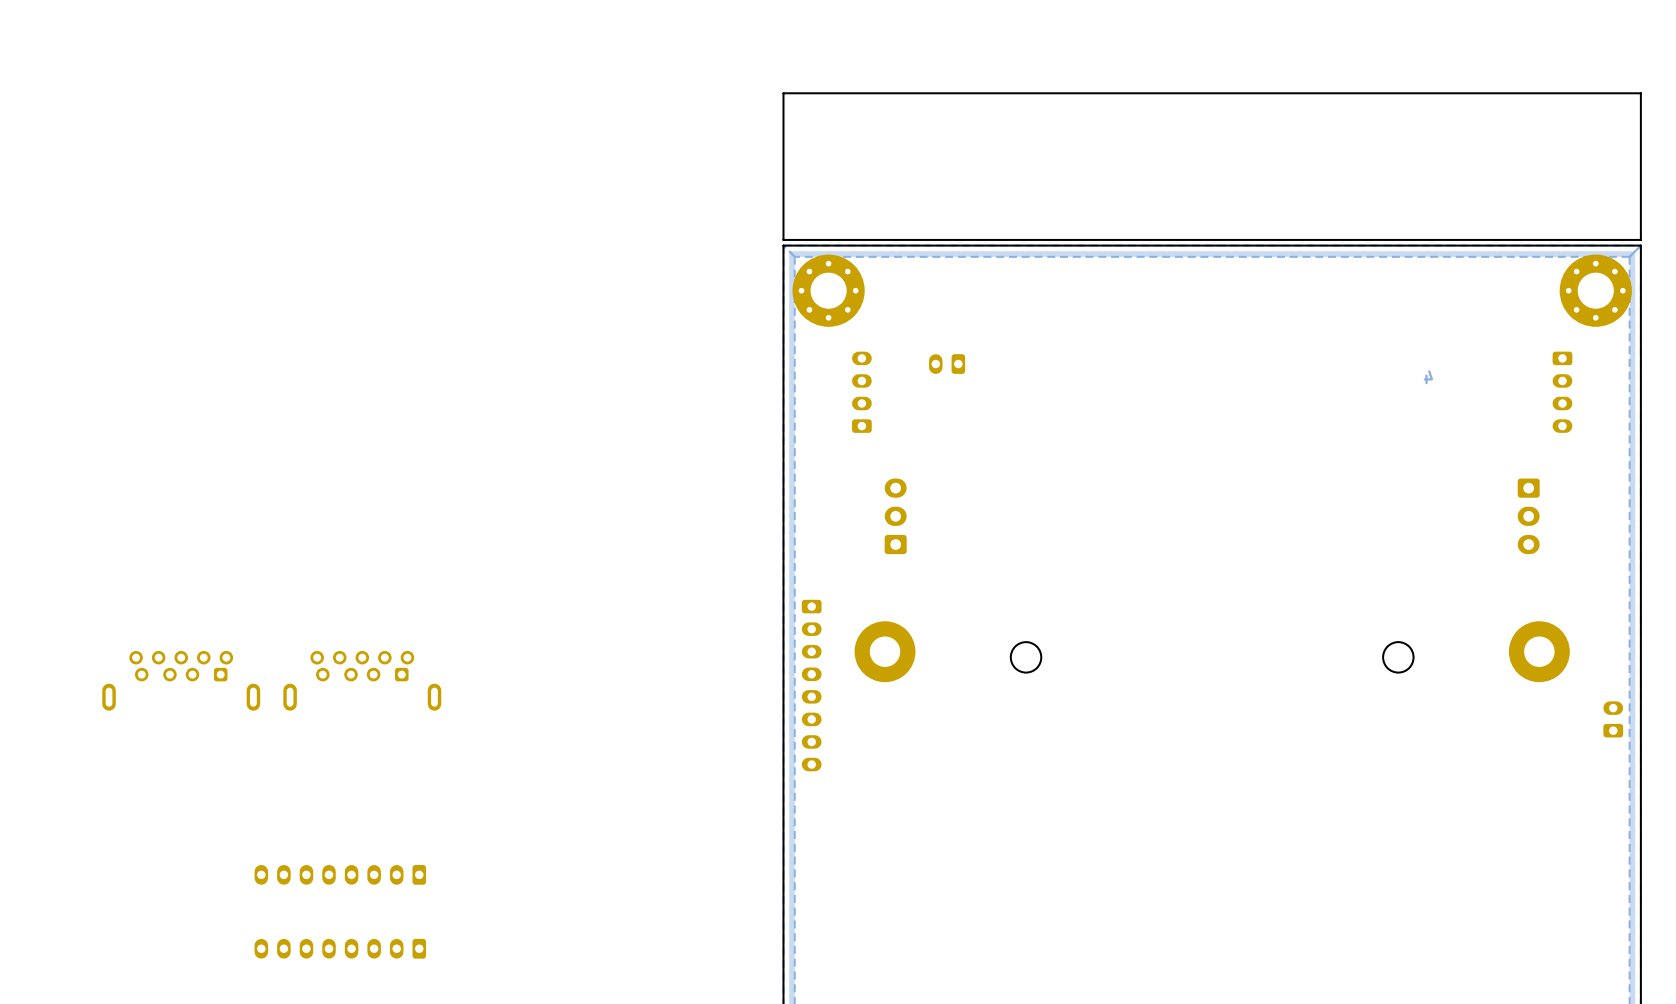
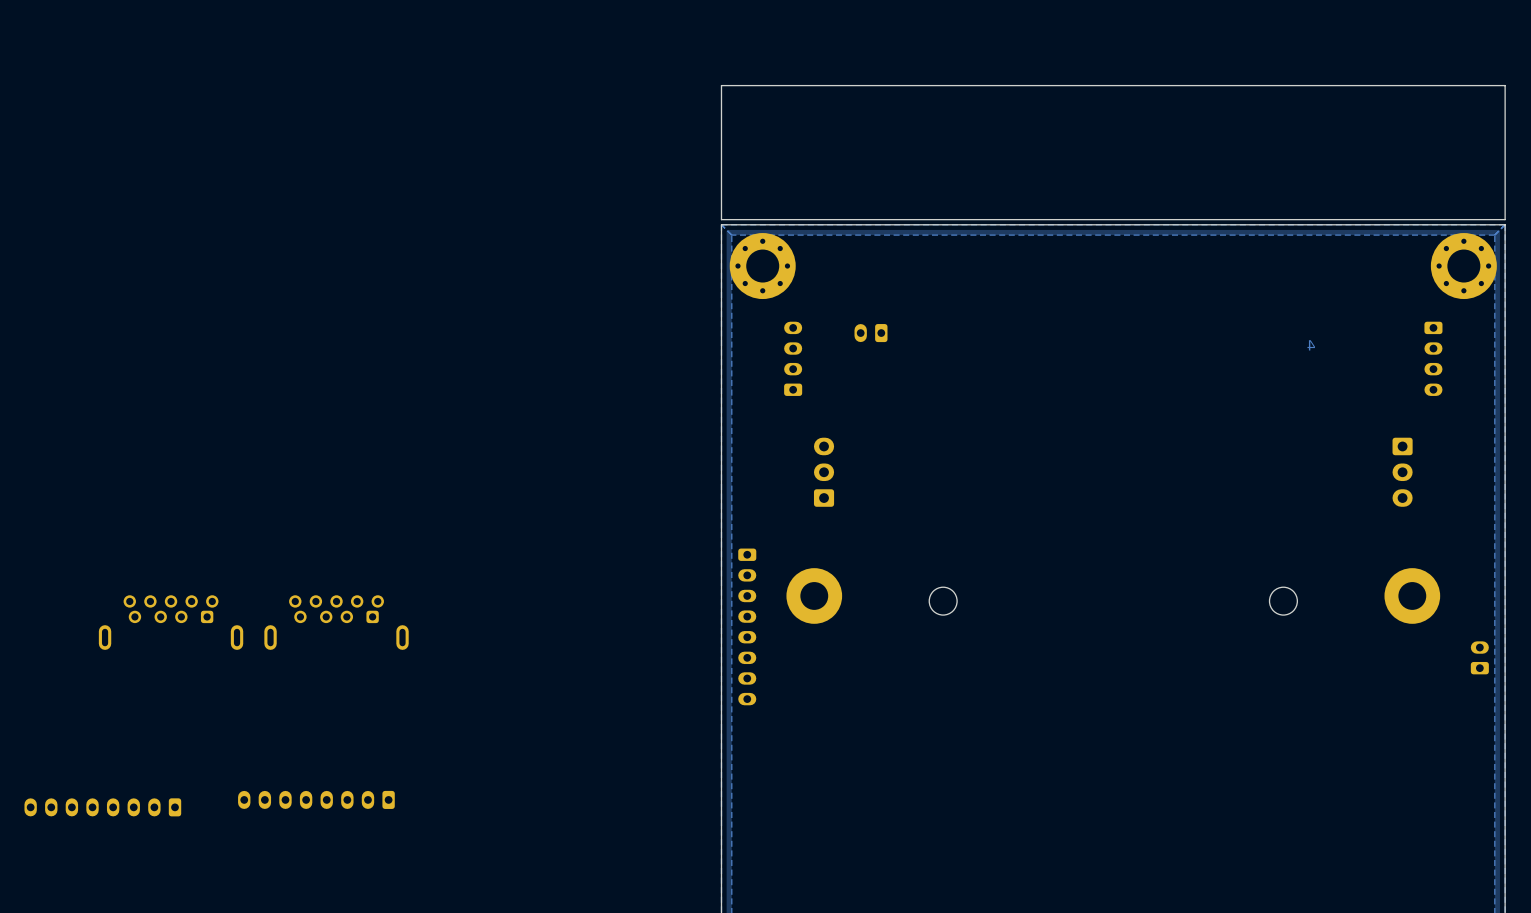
part position: (340, 948) -> (102, 807)

